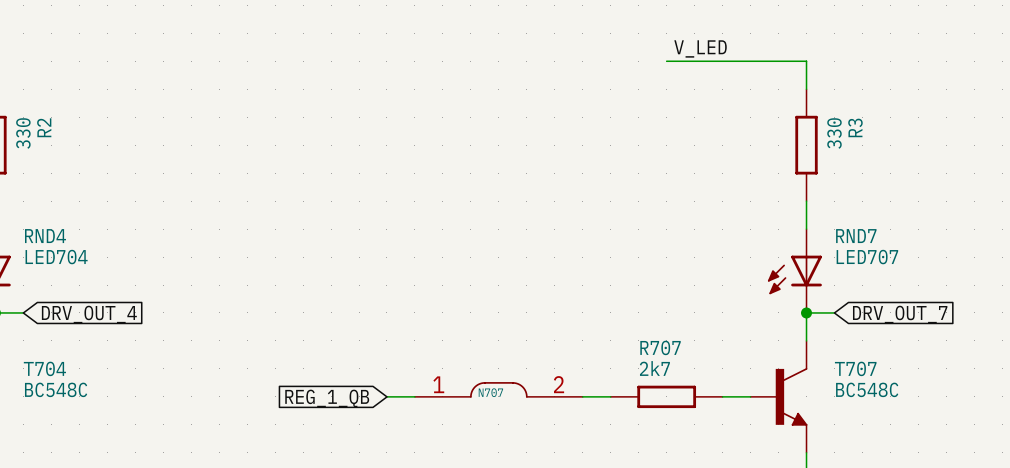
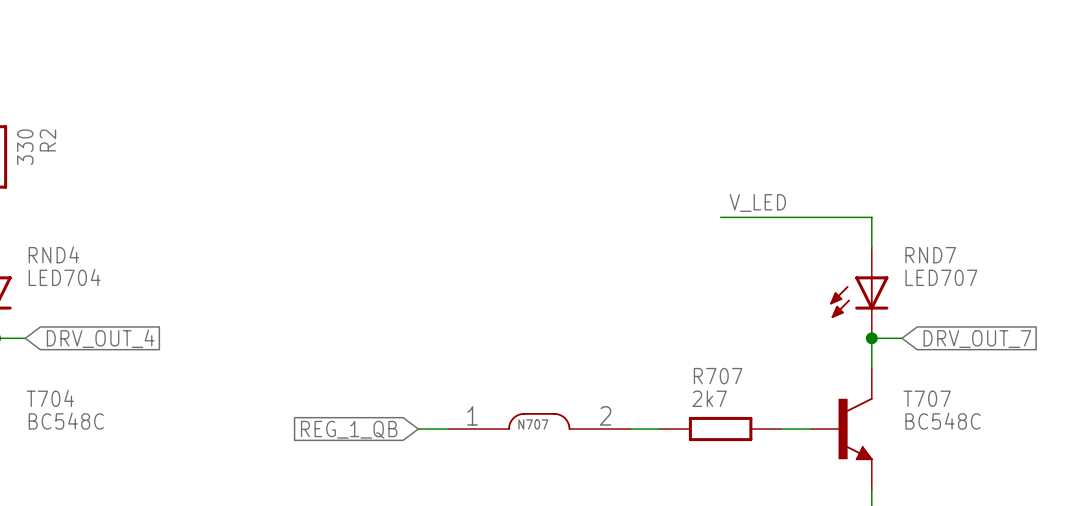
label position: V_LED (700, 48) -> V_LED (757, 202)
wire: (666, 61) (806, 61) (806, 89) -> none
R3: 330 (806, 145) -> none
wire: none -> (720, 217) (871, 217)

